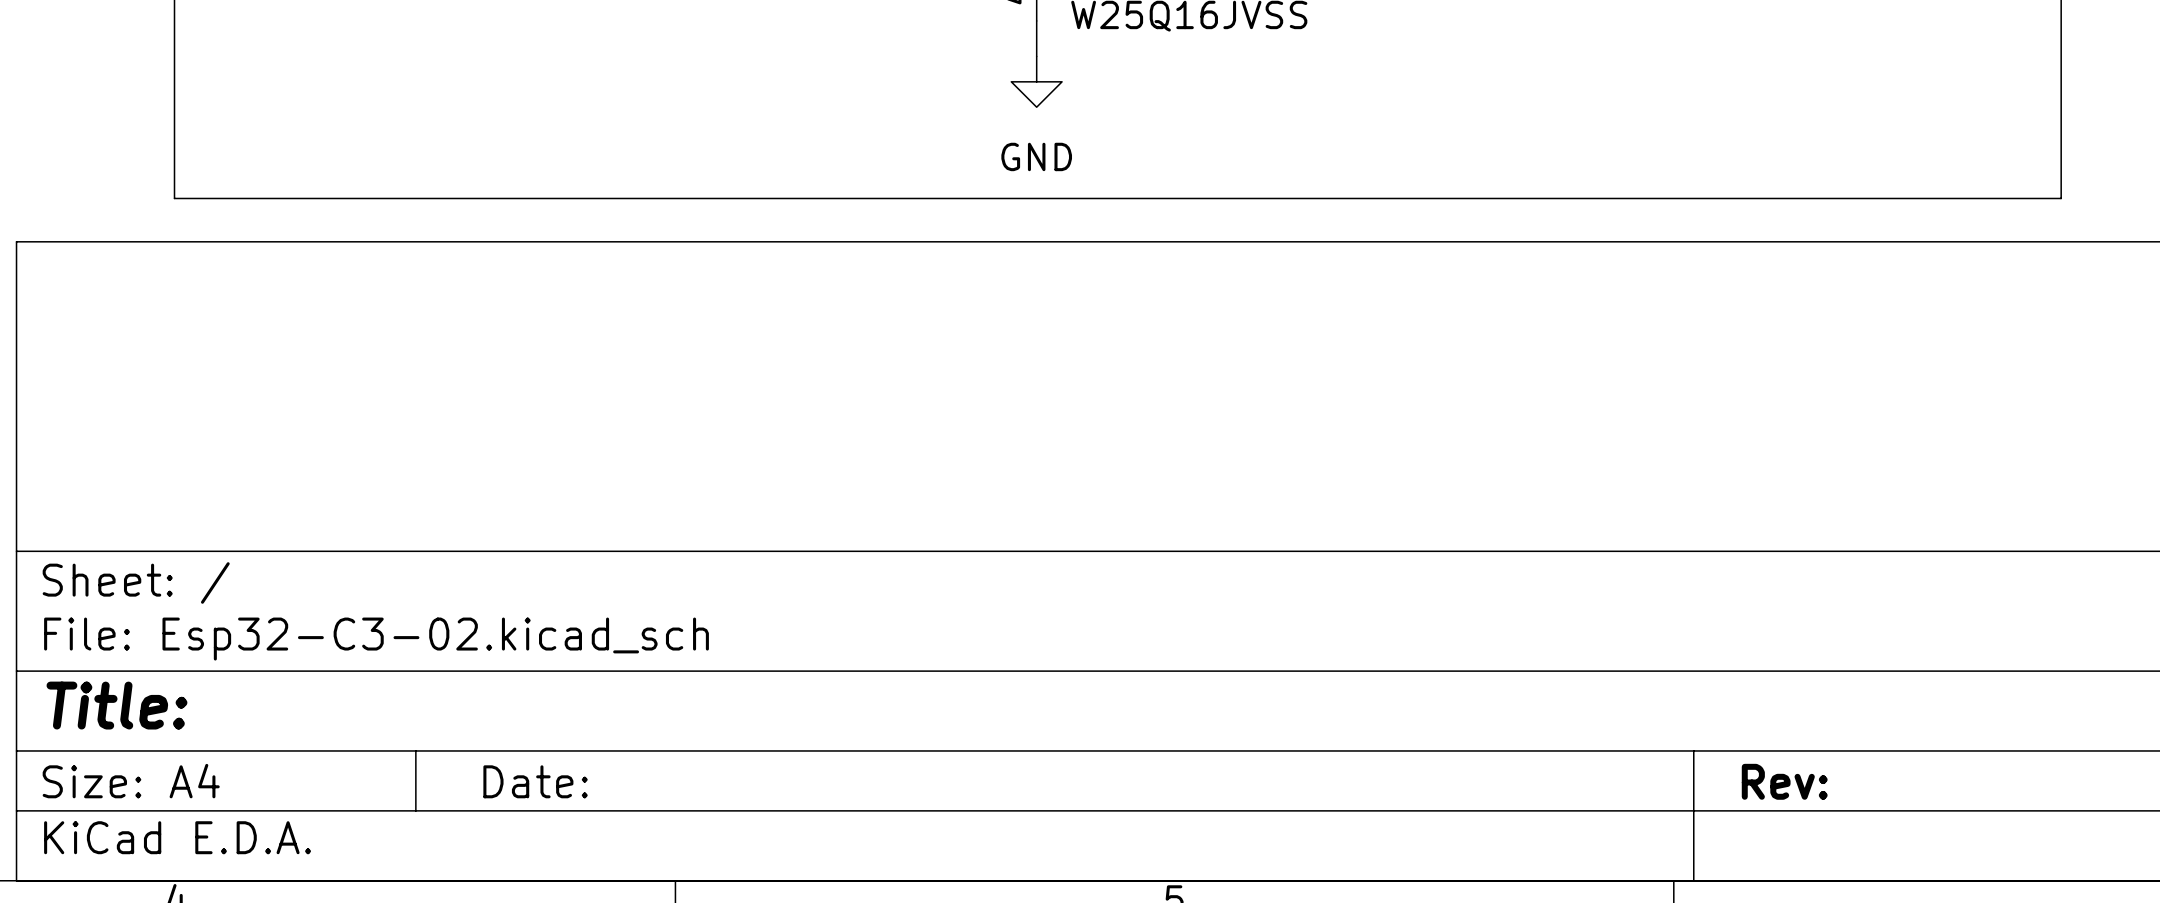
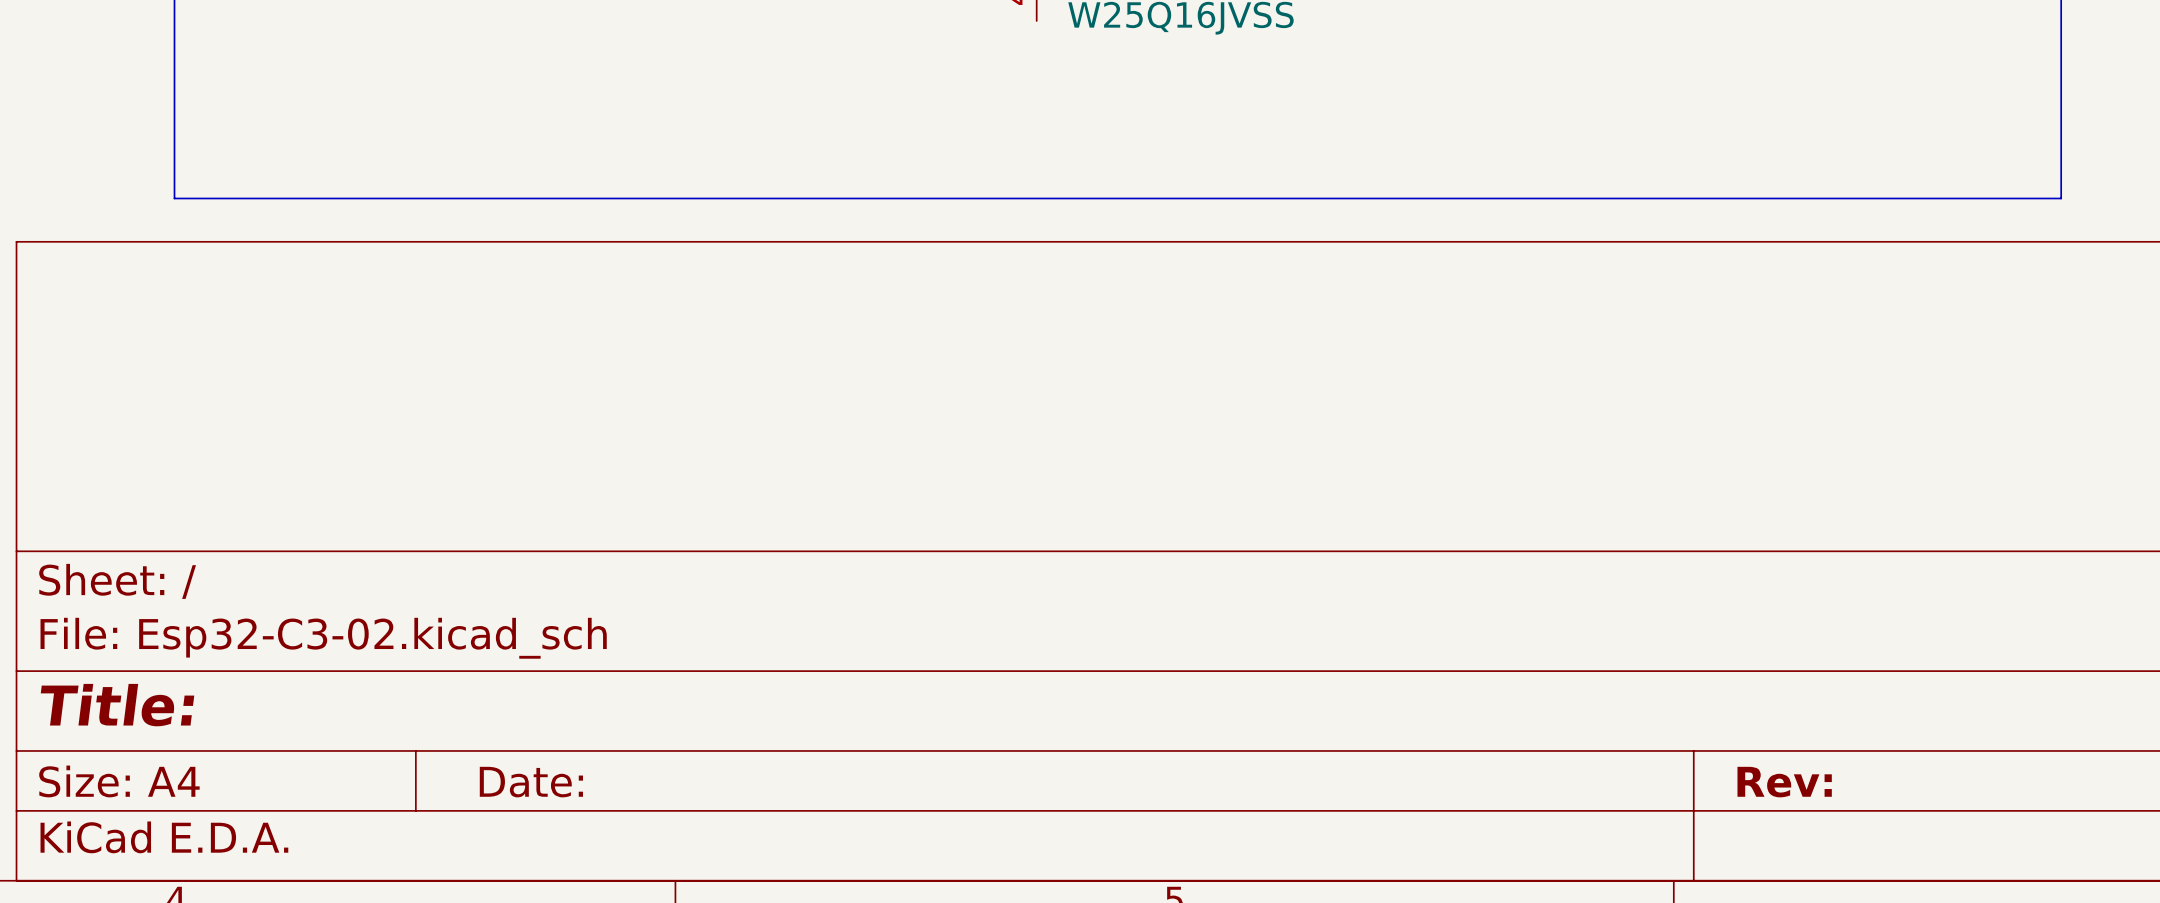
wire: (1036, 20) (1036, 56) -> none
power symbol: GND (1036, 81) -> none

